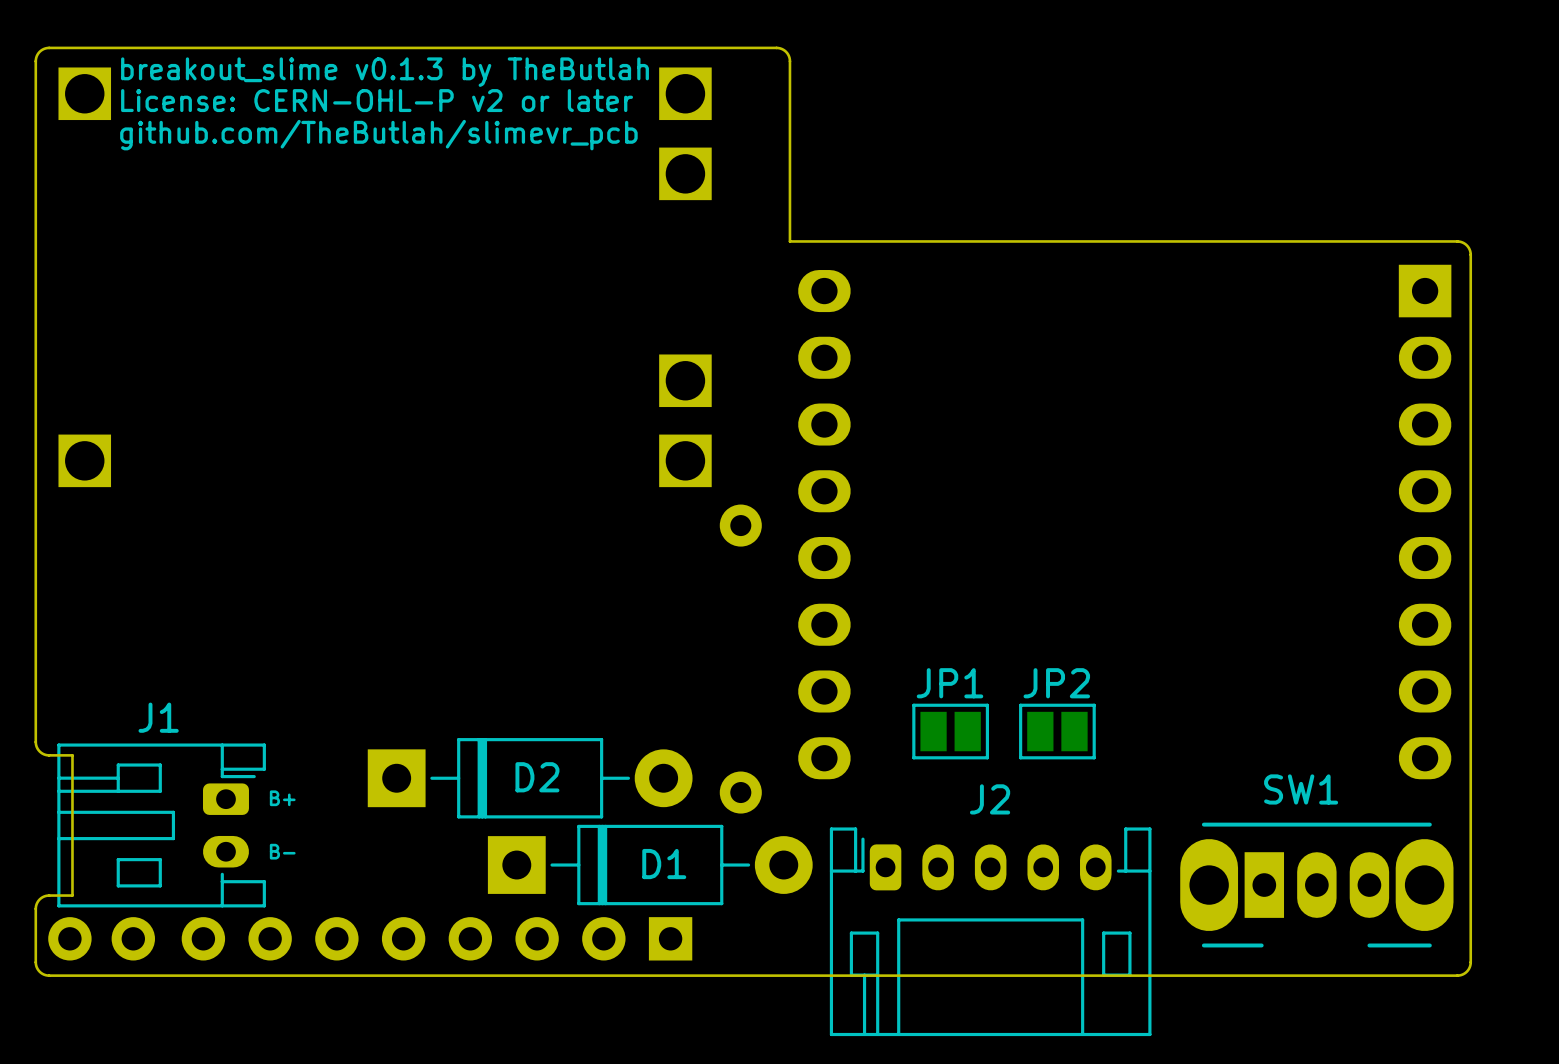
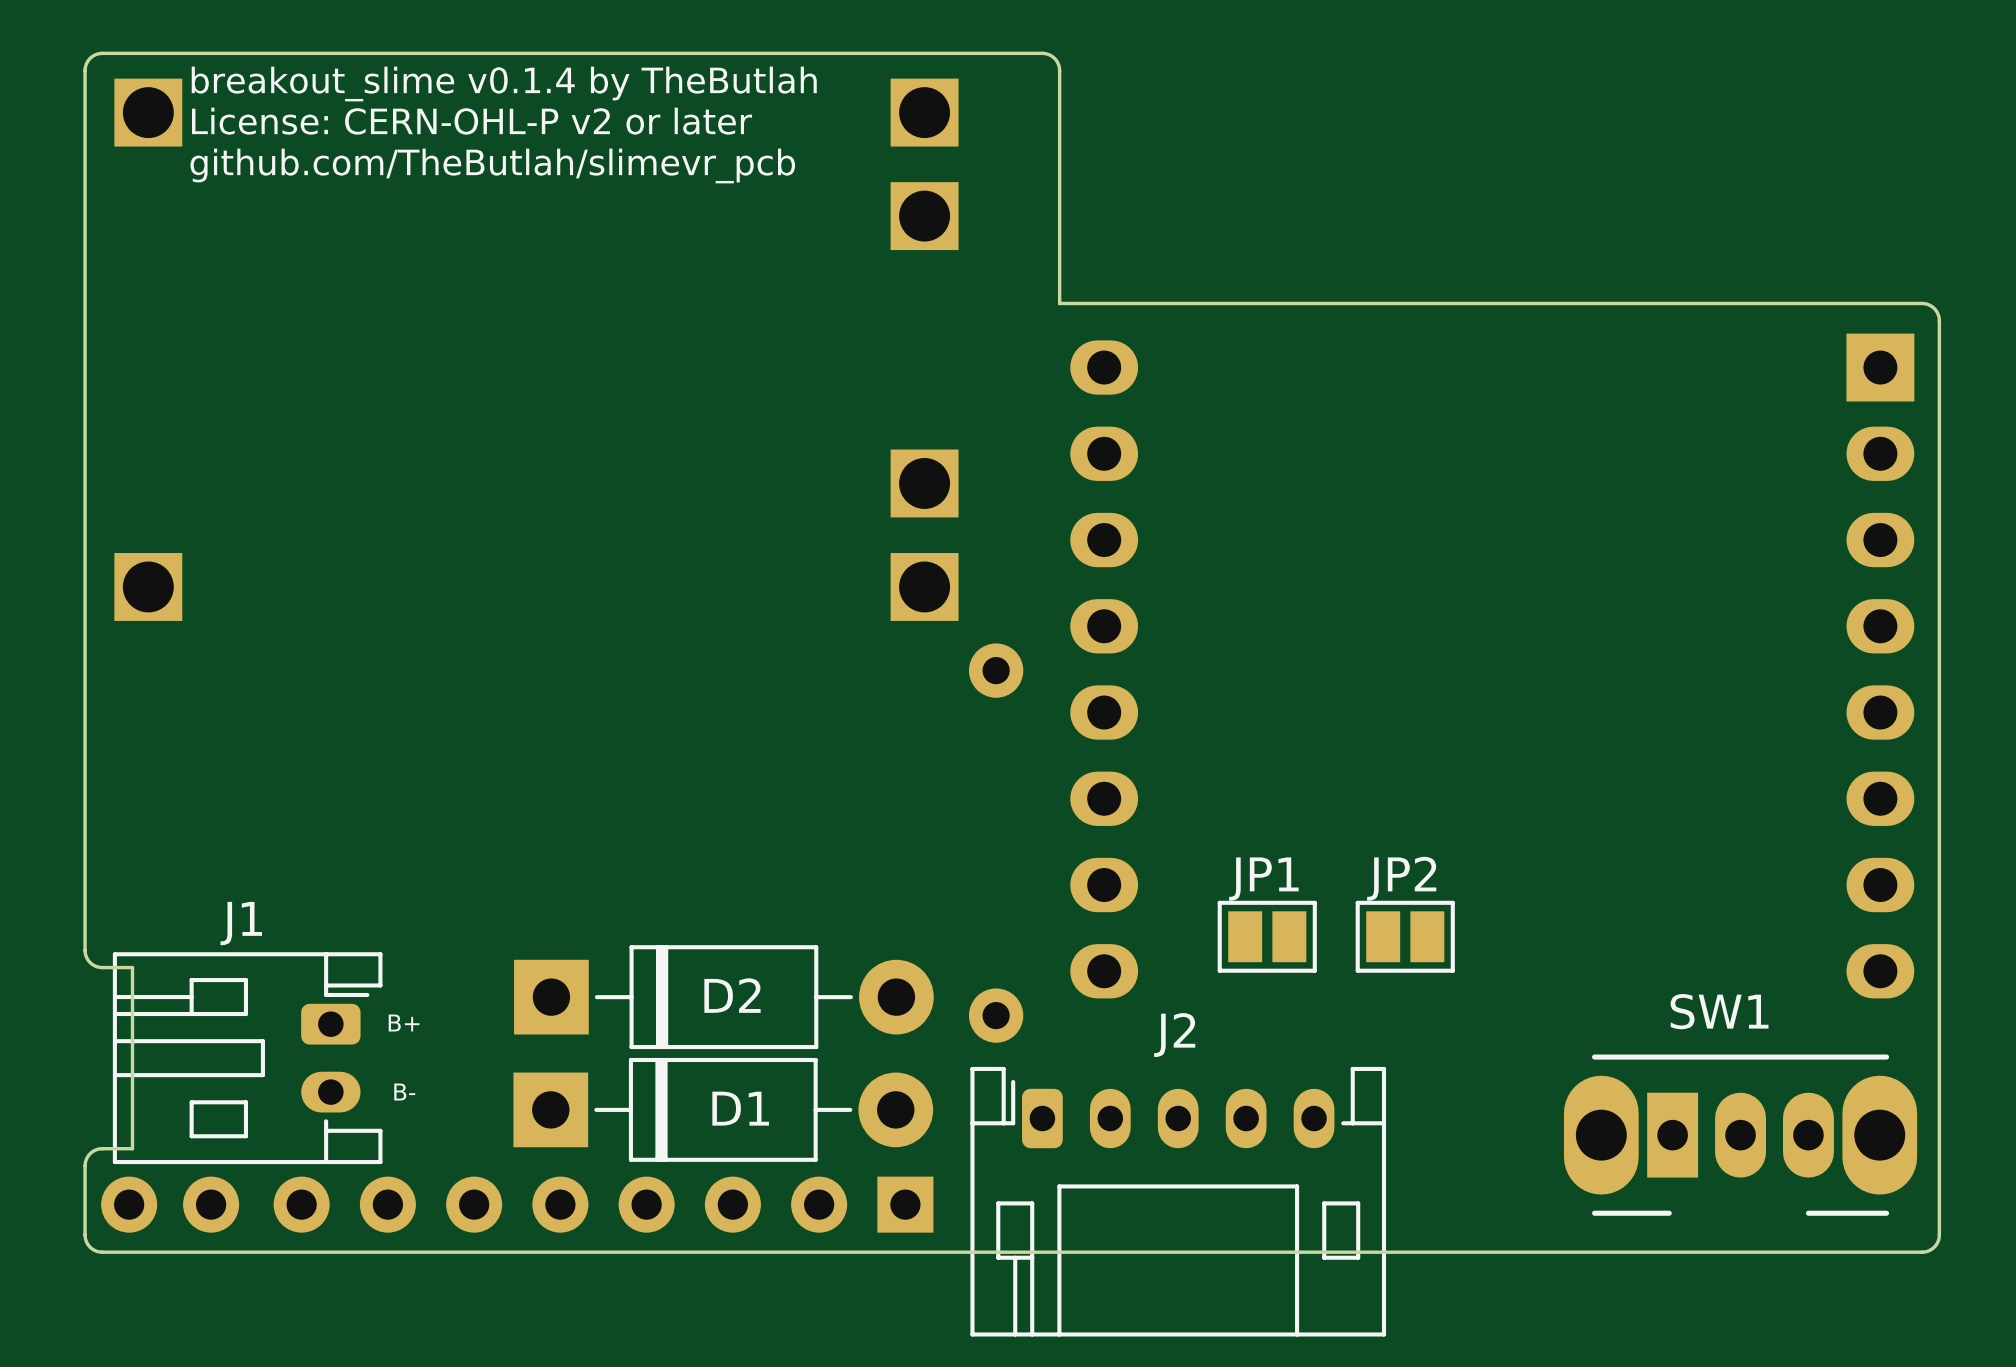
text: breakout_slime v0.1.3 by TheButlah (385, 72) -> breakout_slime v0.1.4 by TheButlah (504, 83)
D1 position: (650, 865) -> (723, 1109)
J2 position: (990, 931) -> (1178, 1201)

